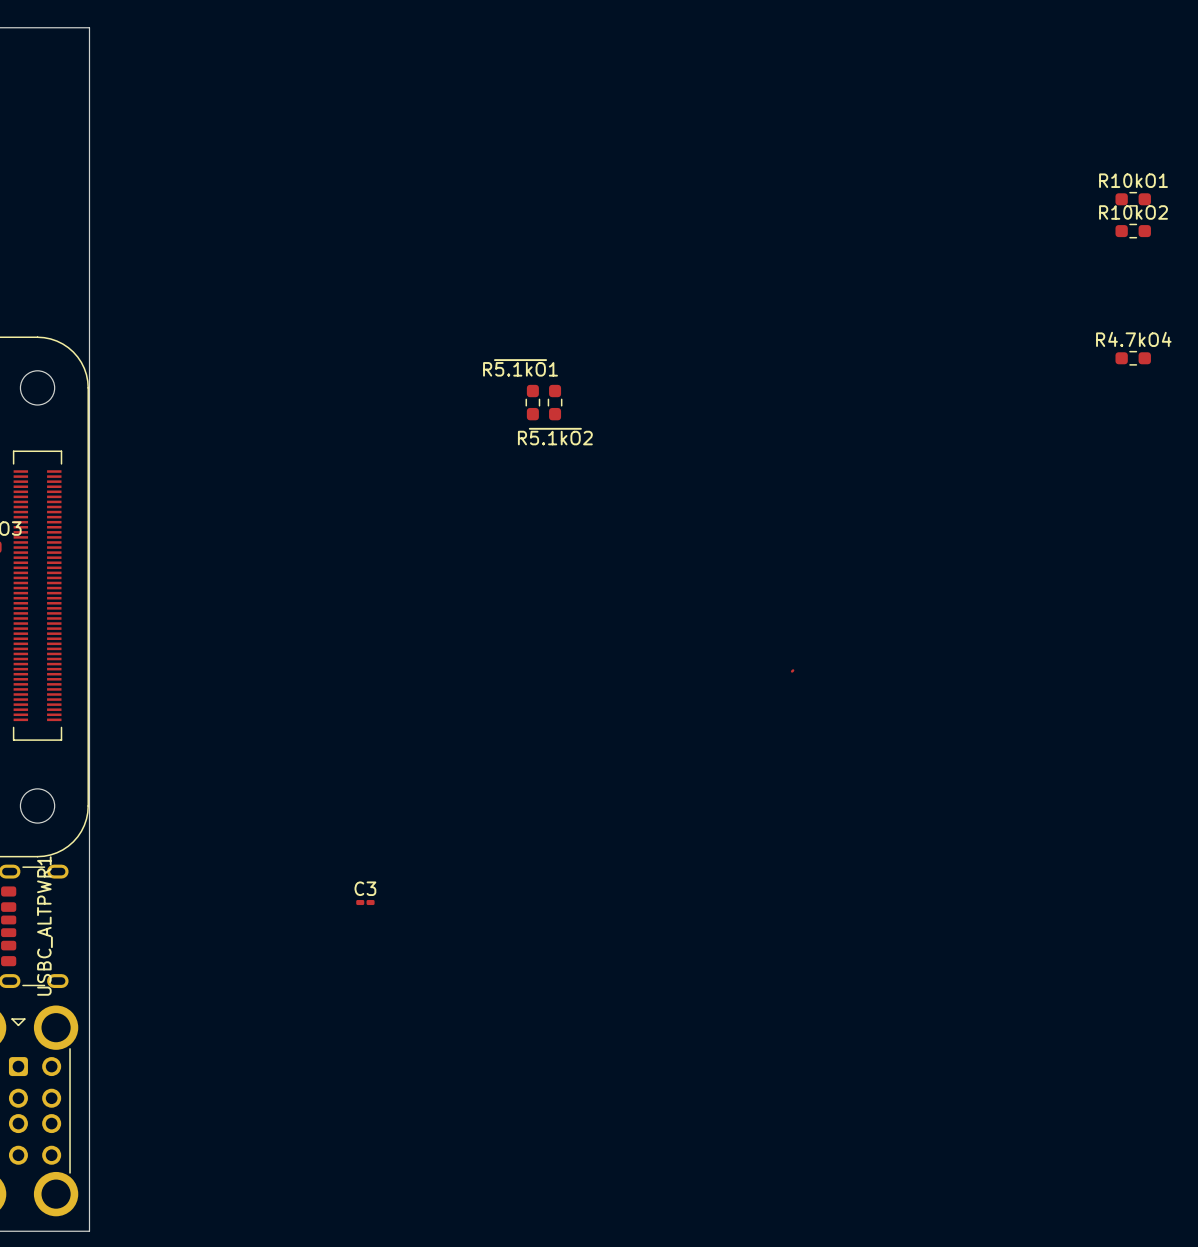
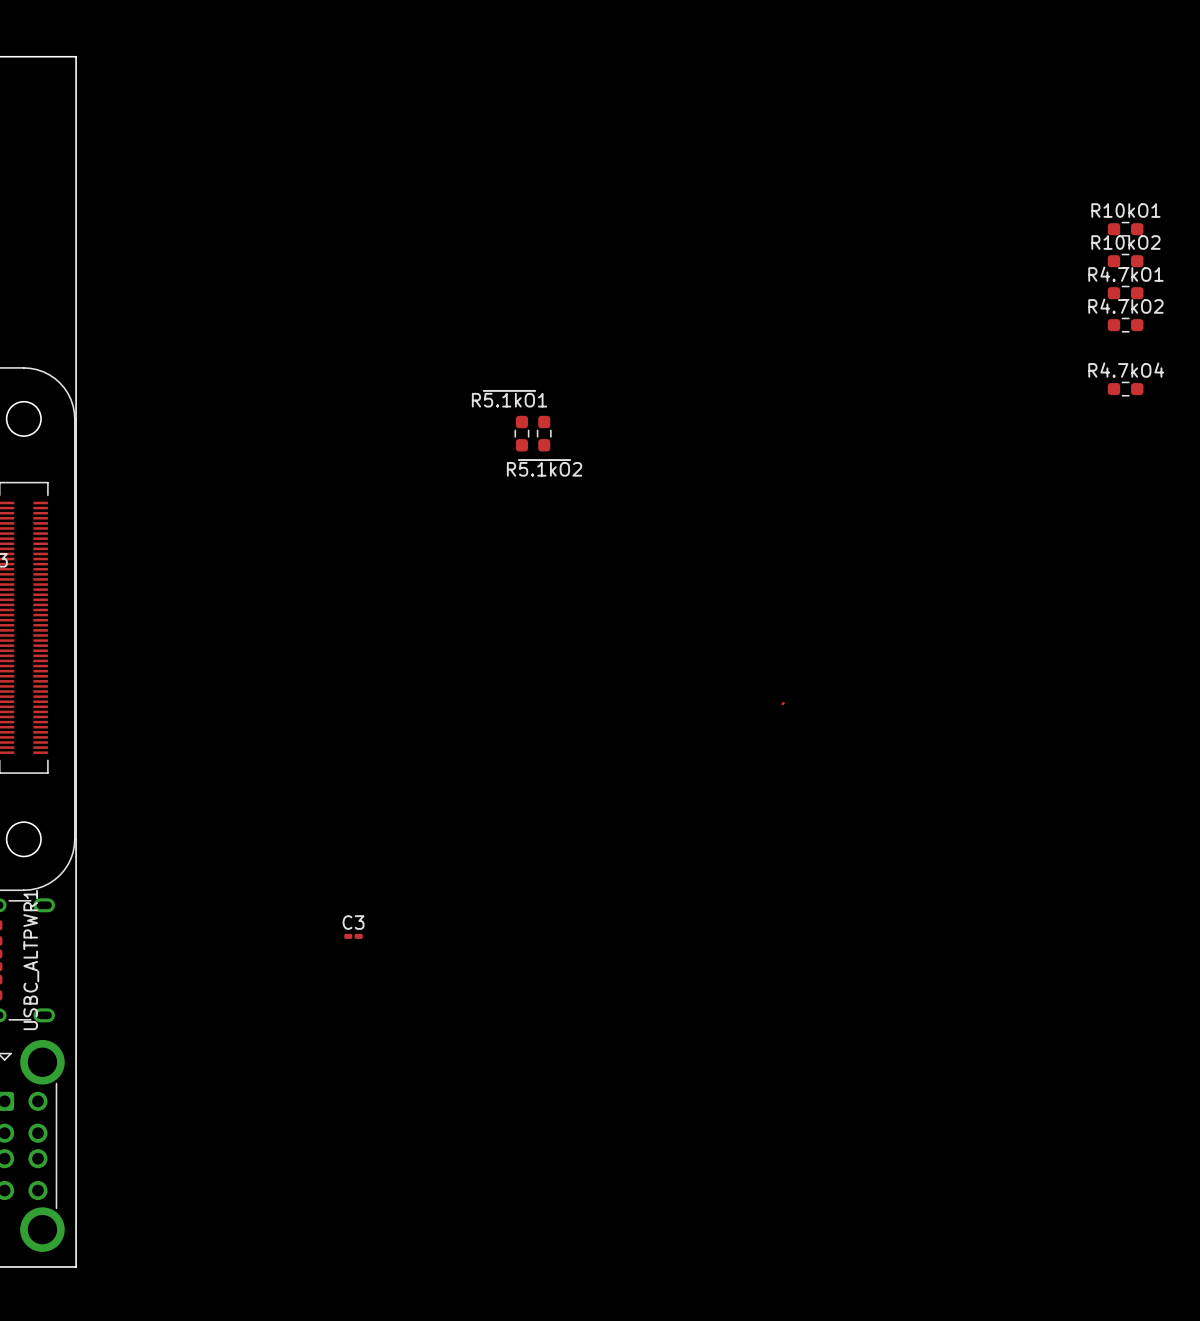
R4.7kO1: none -> (1125, 293)
R4.7kO2: none -> (1125, 325)

